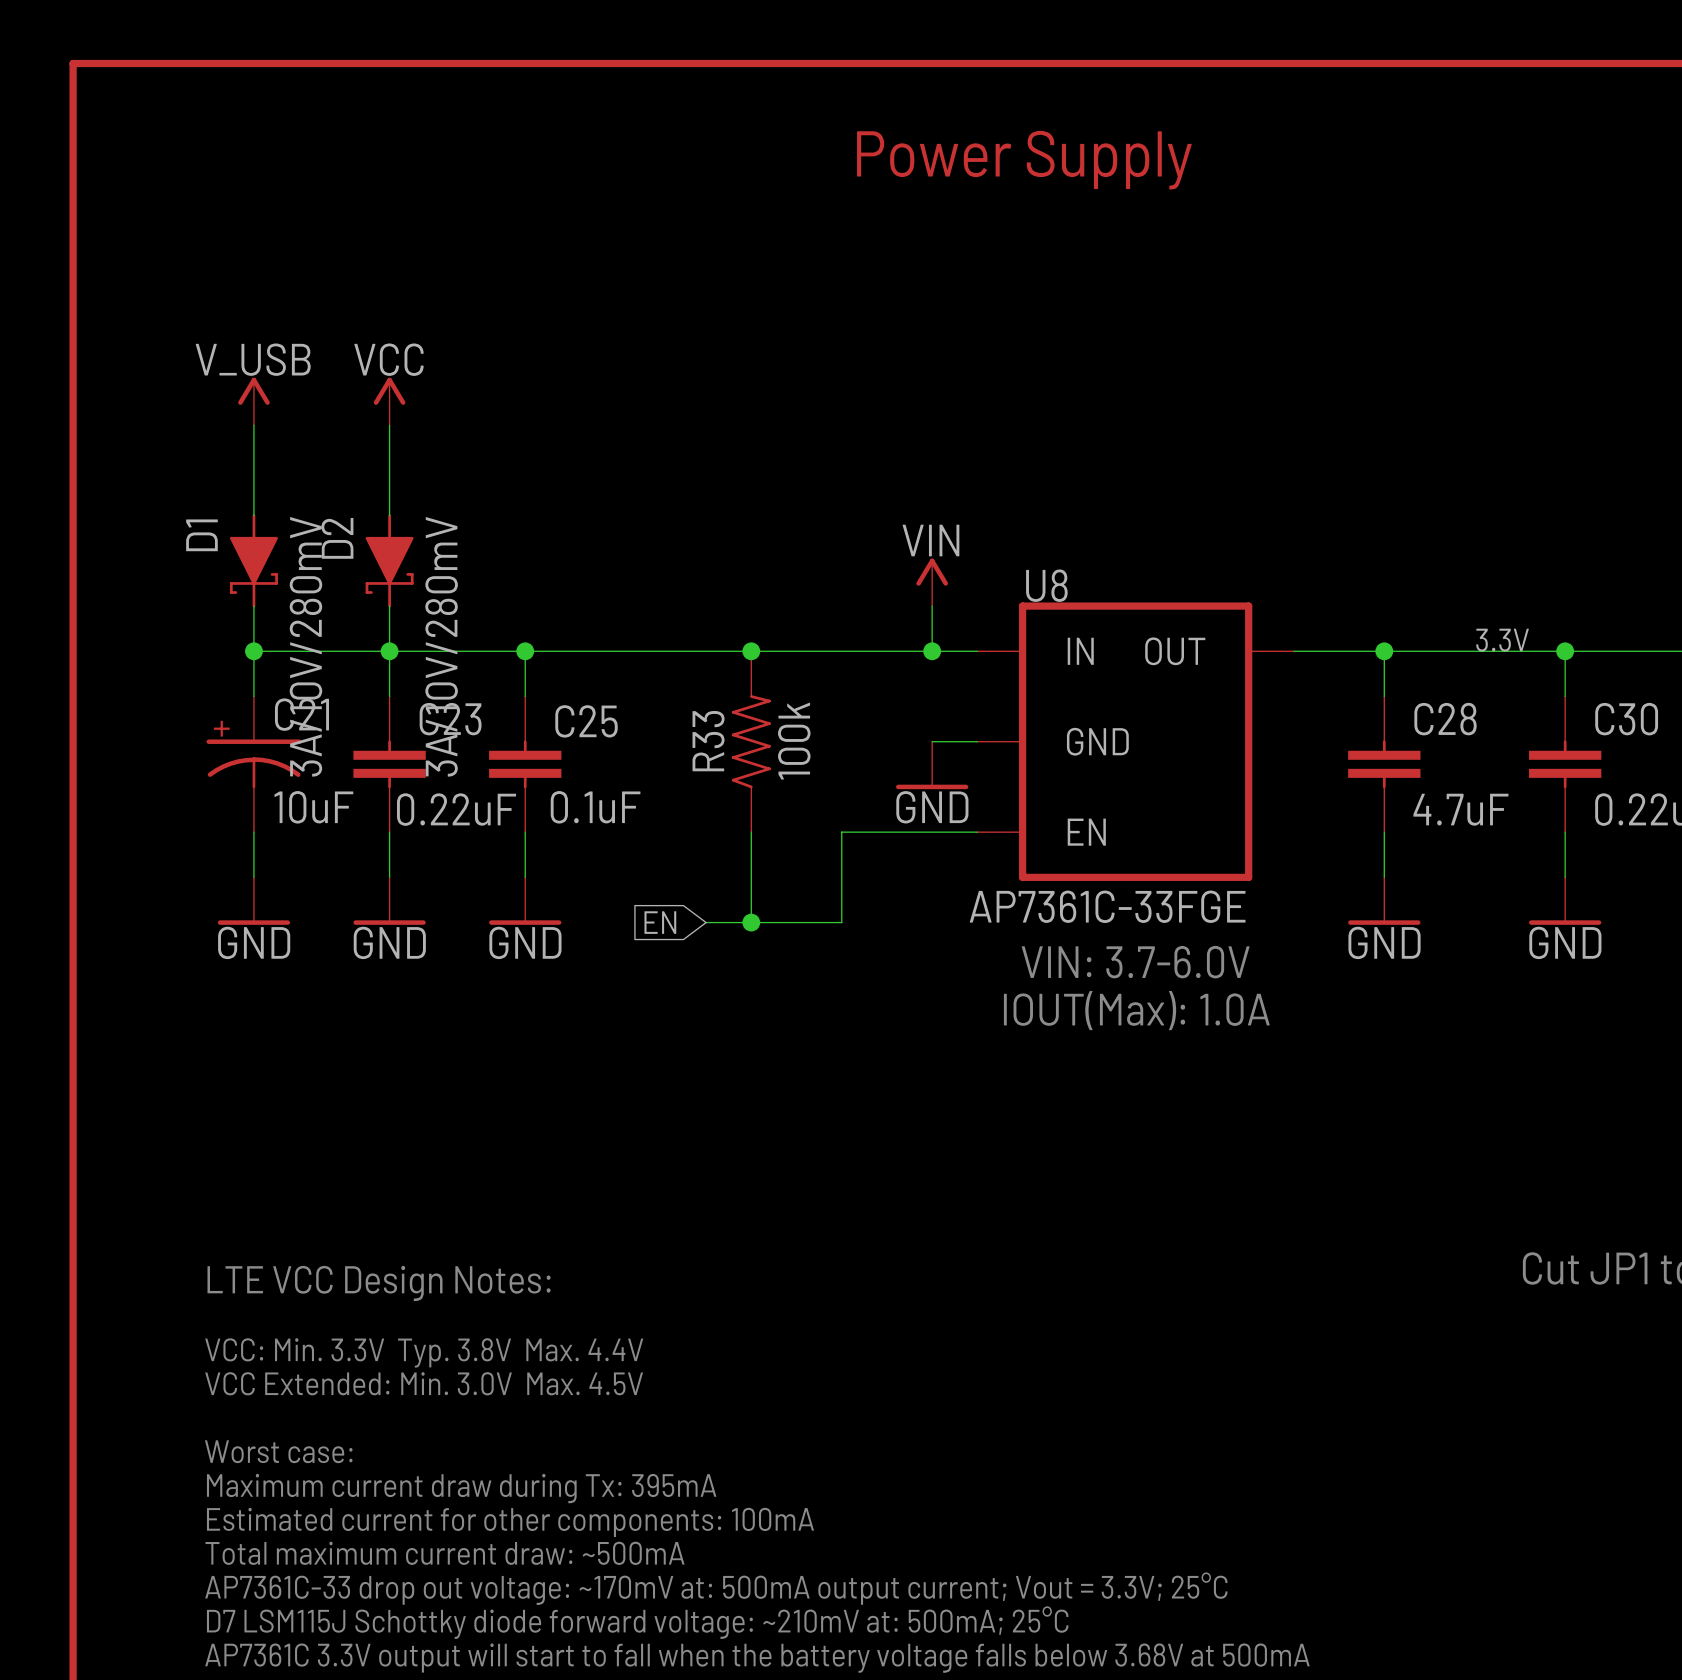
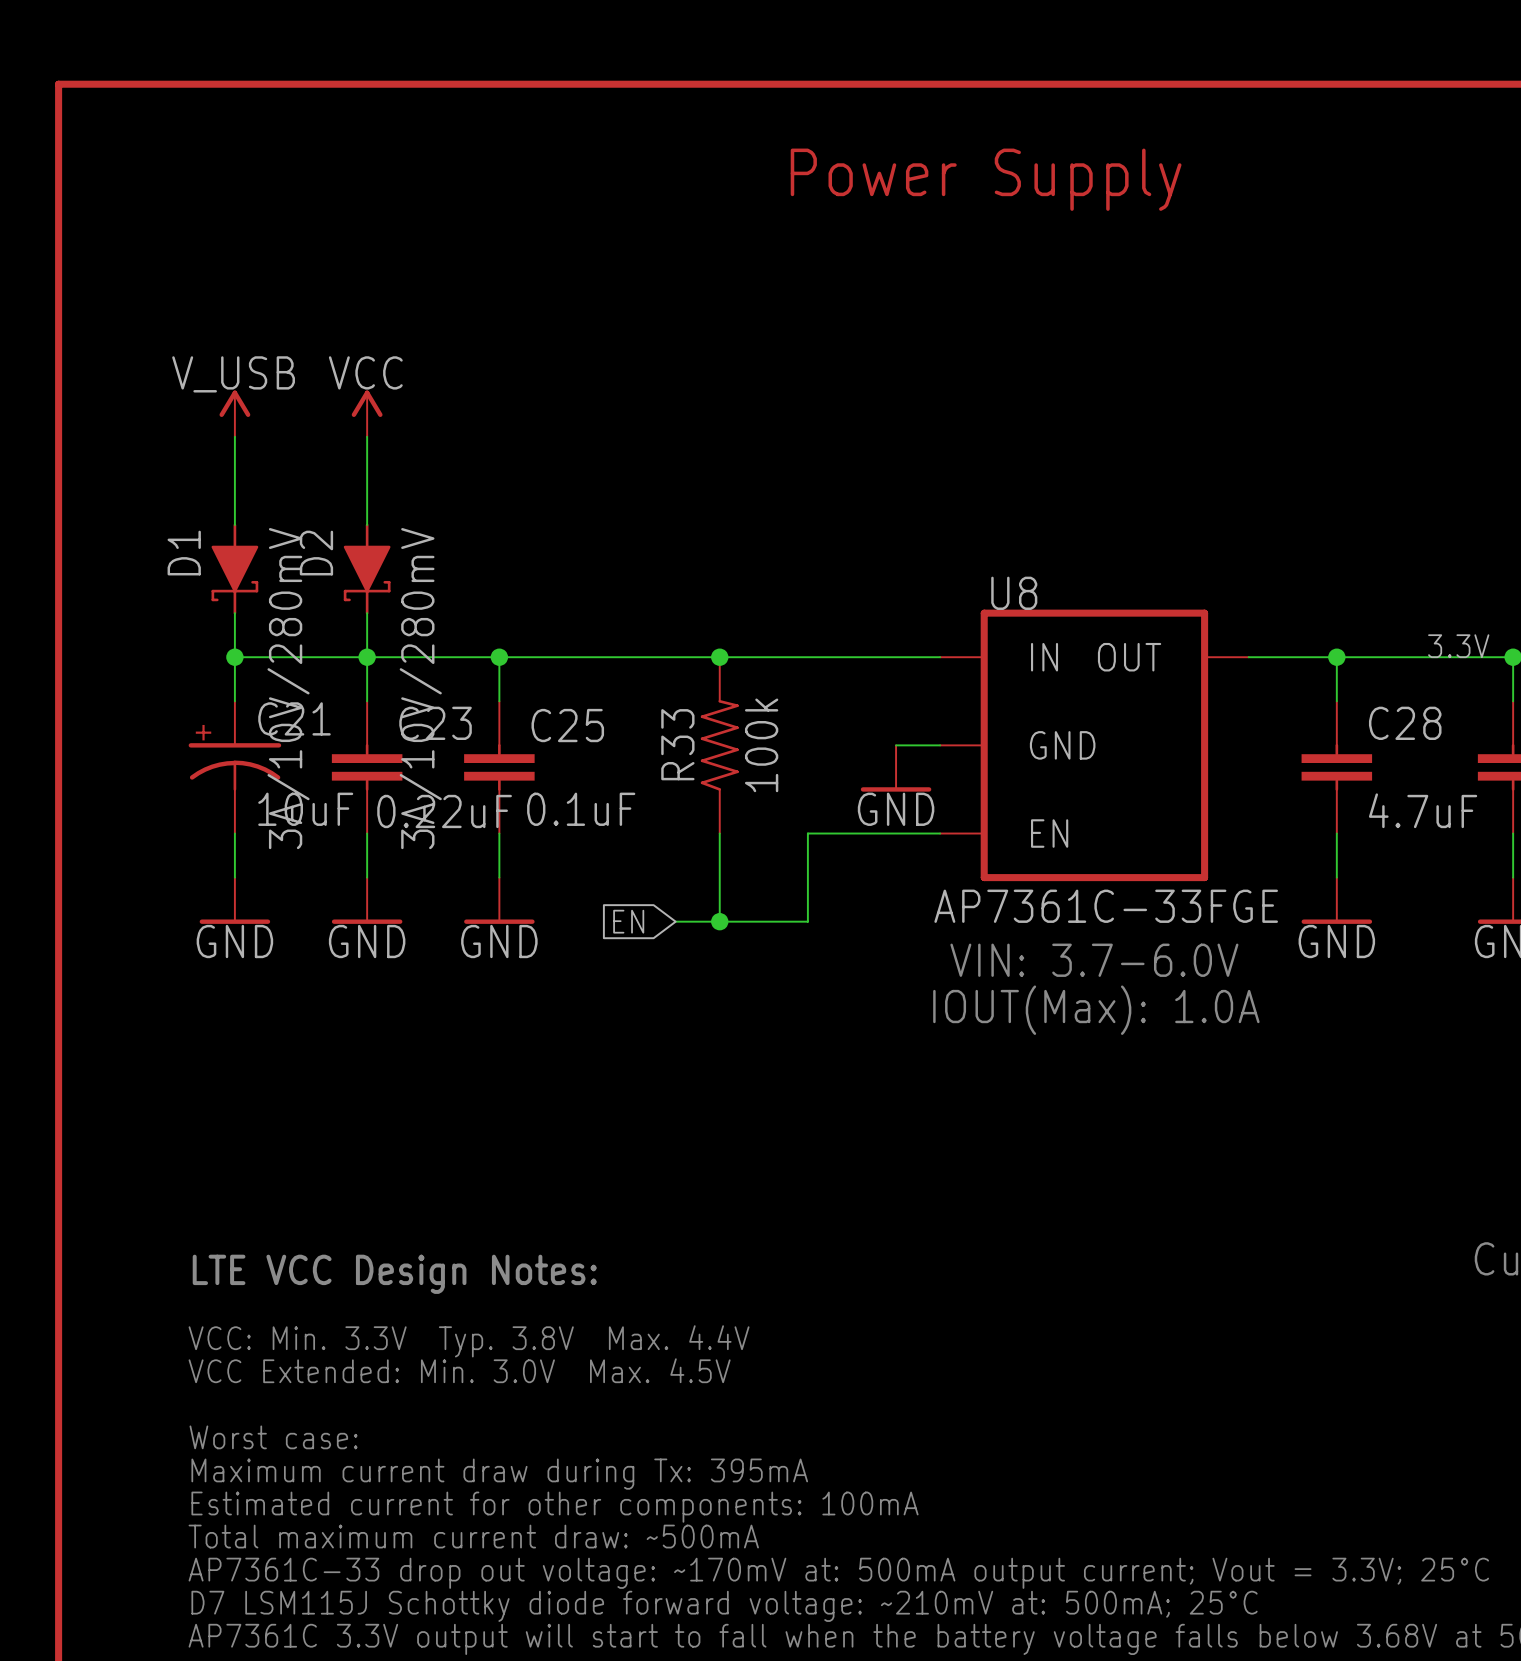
power symbol: VIN (932, 582) -> none
wire: (932, 606) (932, 651) -> none
junction: (932, 651) -> none

